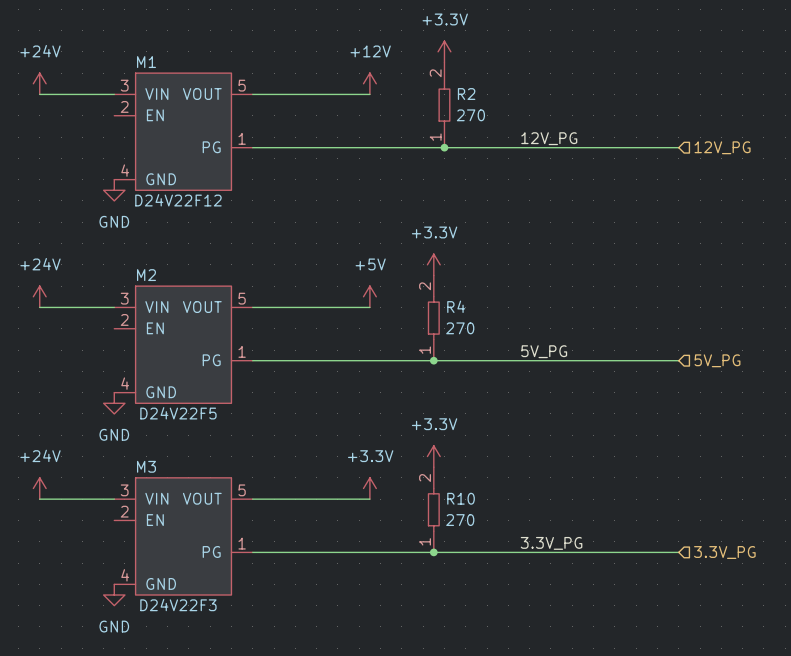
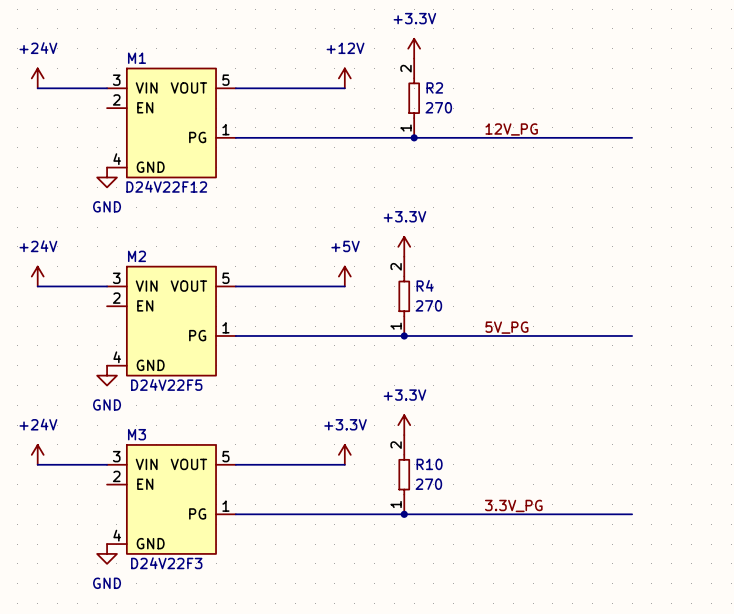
hierarchical label: 12V_PG (722, 147) -> none
hierarchical label: 5V_PG (717, 360) -> none
hierarchical label: 3.3V_PG (724, 552) -> none

